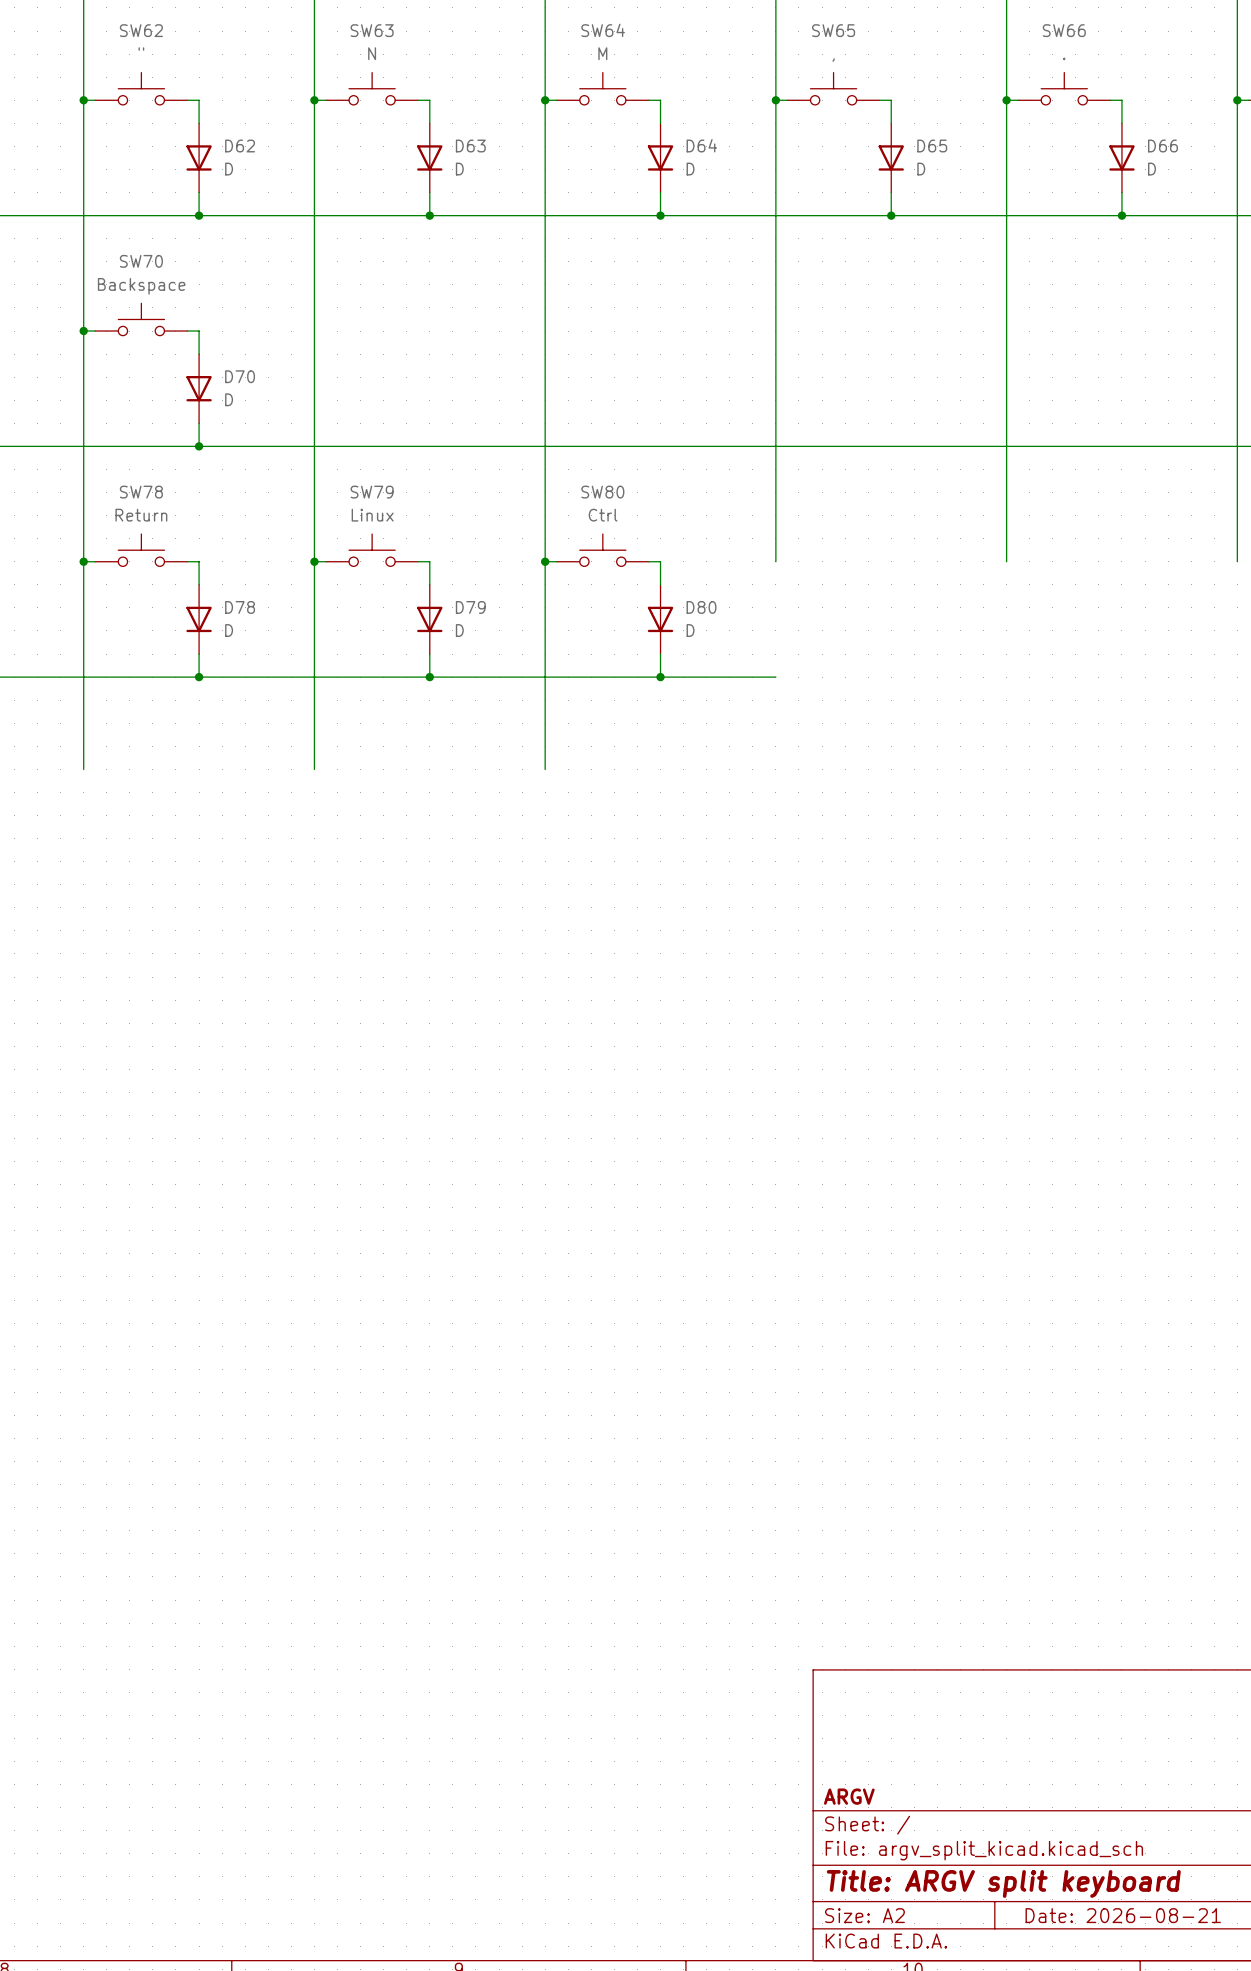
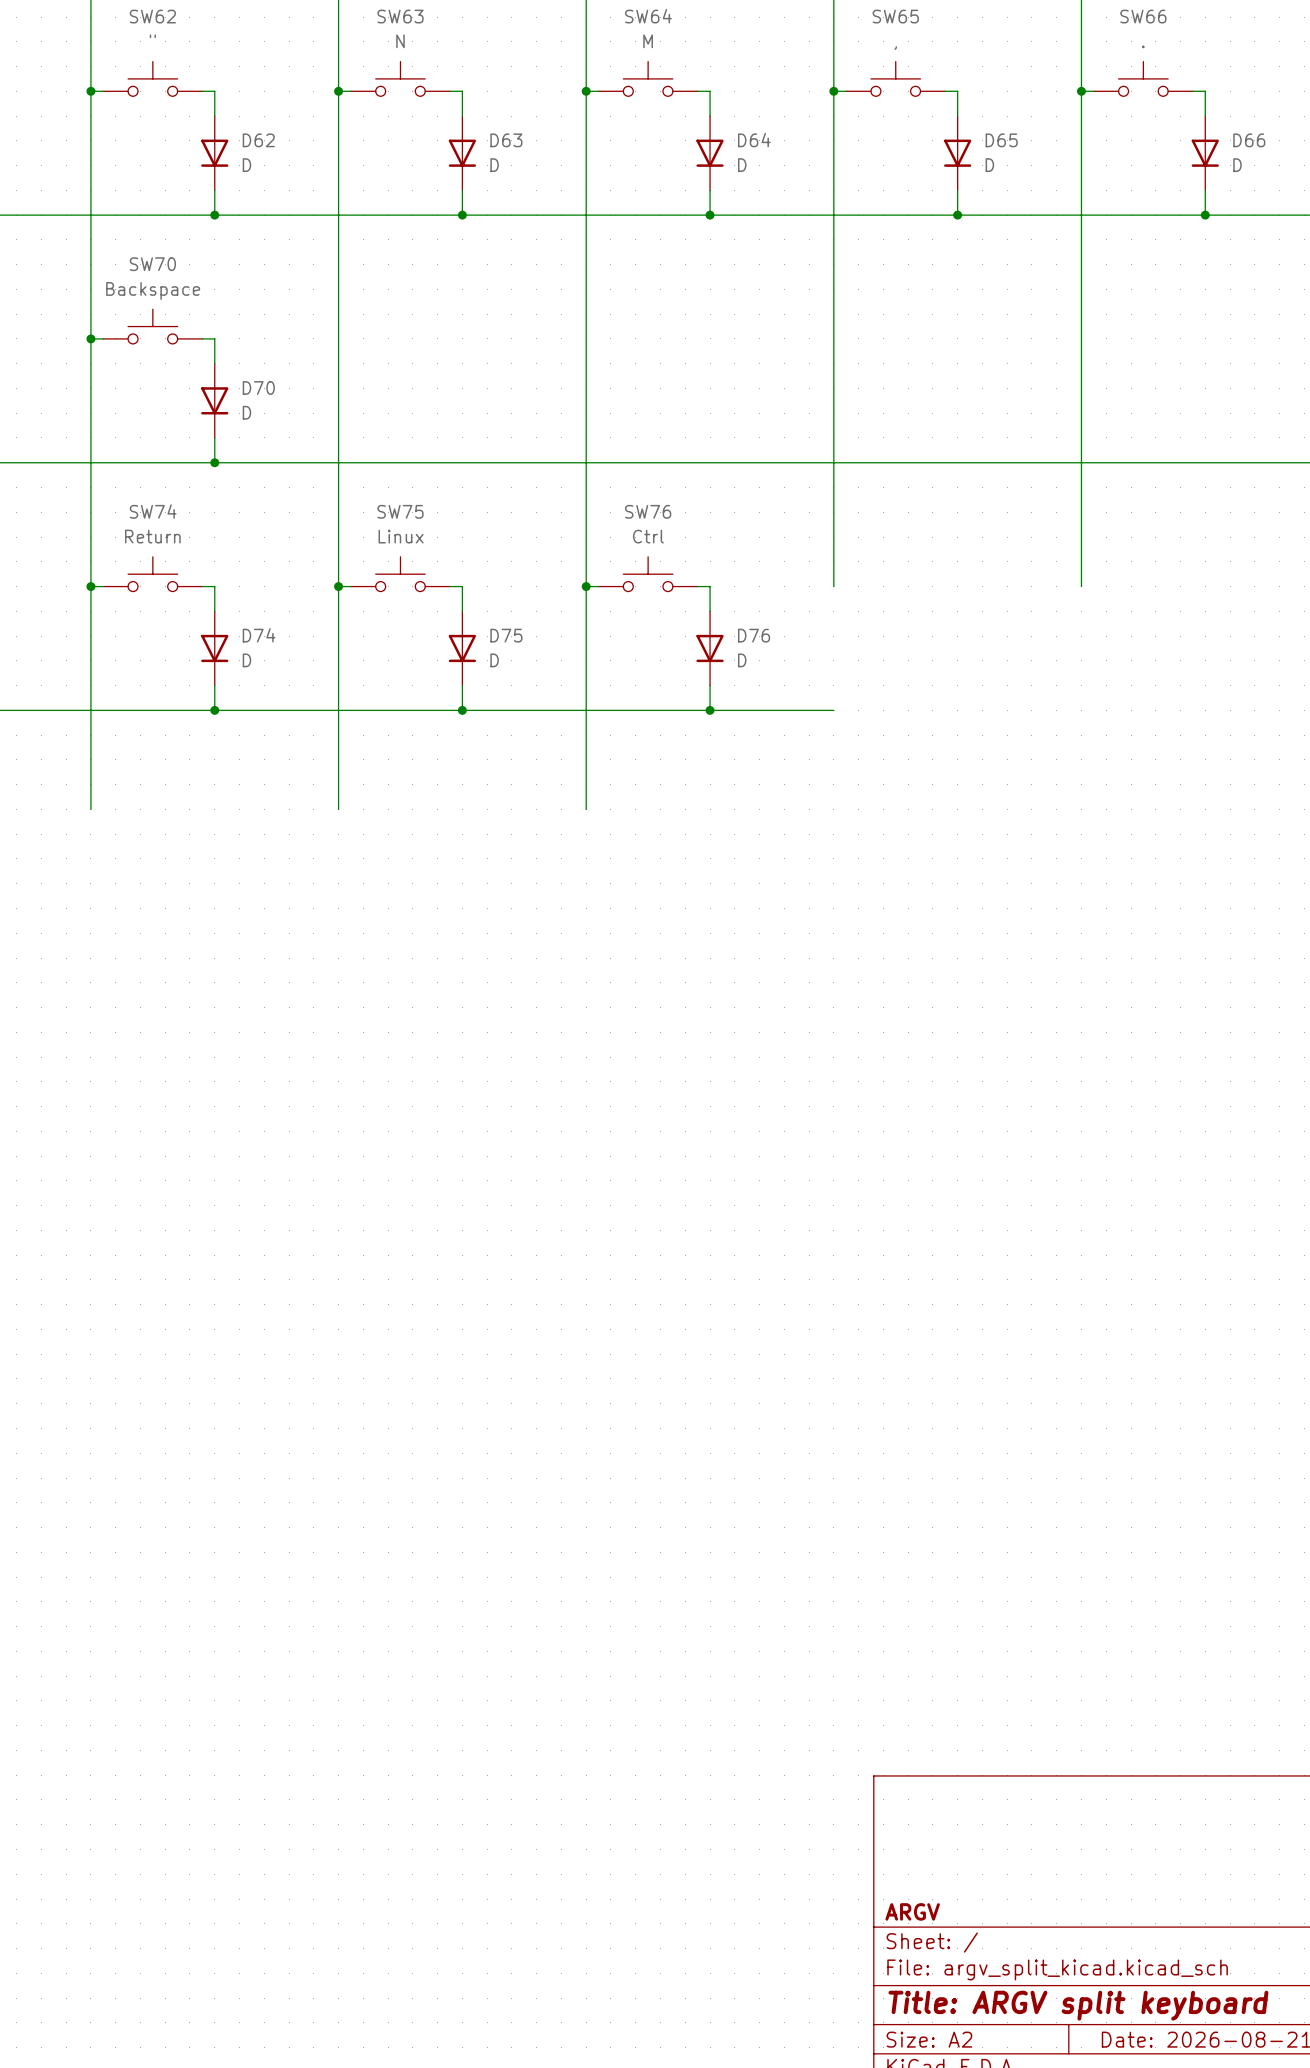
SW78 name: SW78 (141, 492) -> SW74 (153, 511)
SW79 name: SW79 (372, 492) -> SW75 (400, 511)
SW80 name: SW80 (602, 492) -> SW76 (648, 511)
D78 name: D78 (240, 607) -> D74 (259, 635)
D79 name: D79 (470, 607) -> D75 (506, 635)
D80 name: D80 (701, 607) -> D76 (754, 635)

